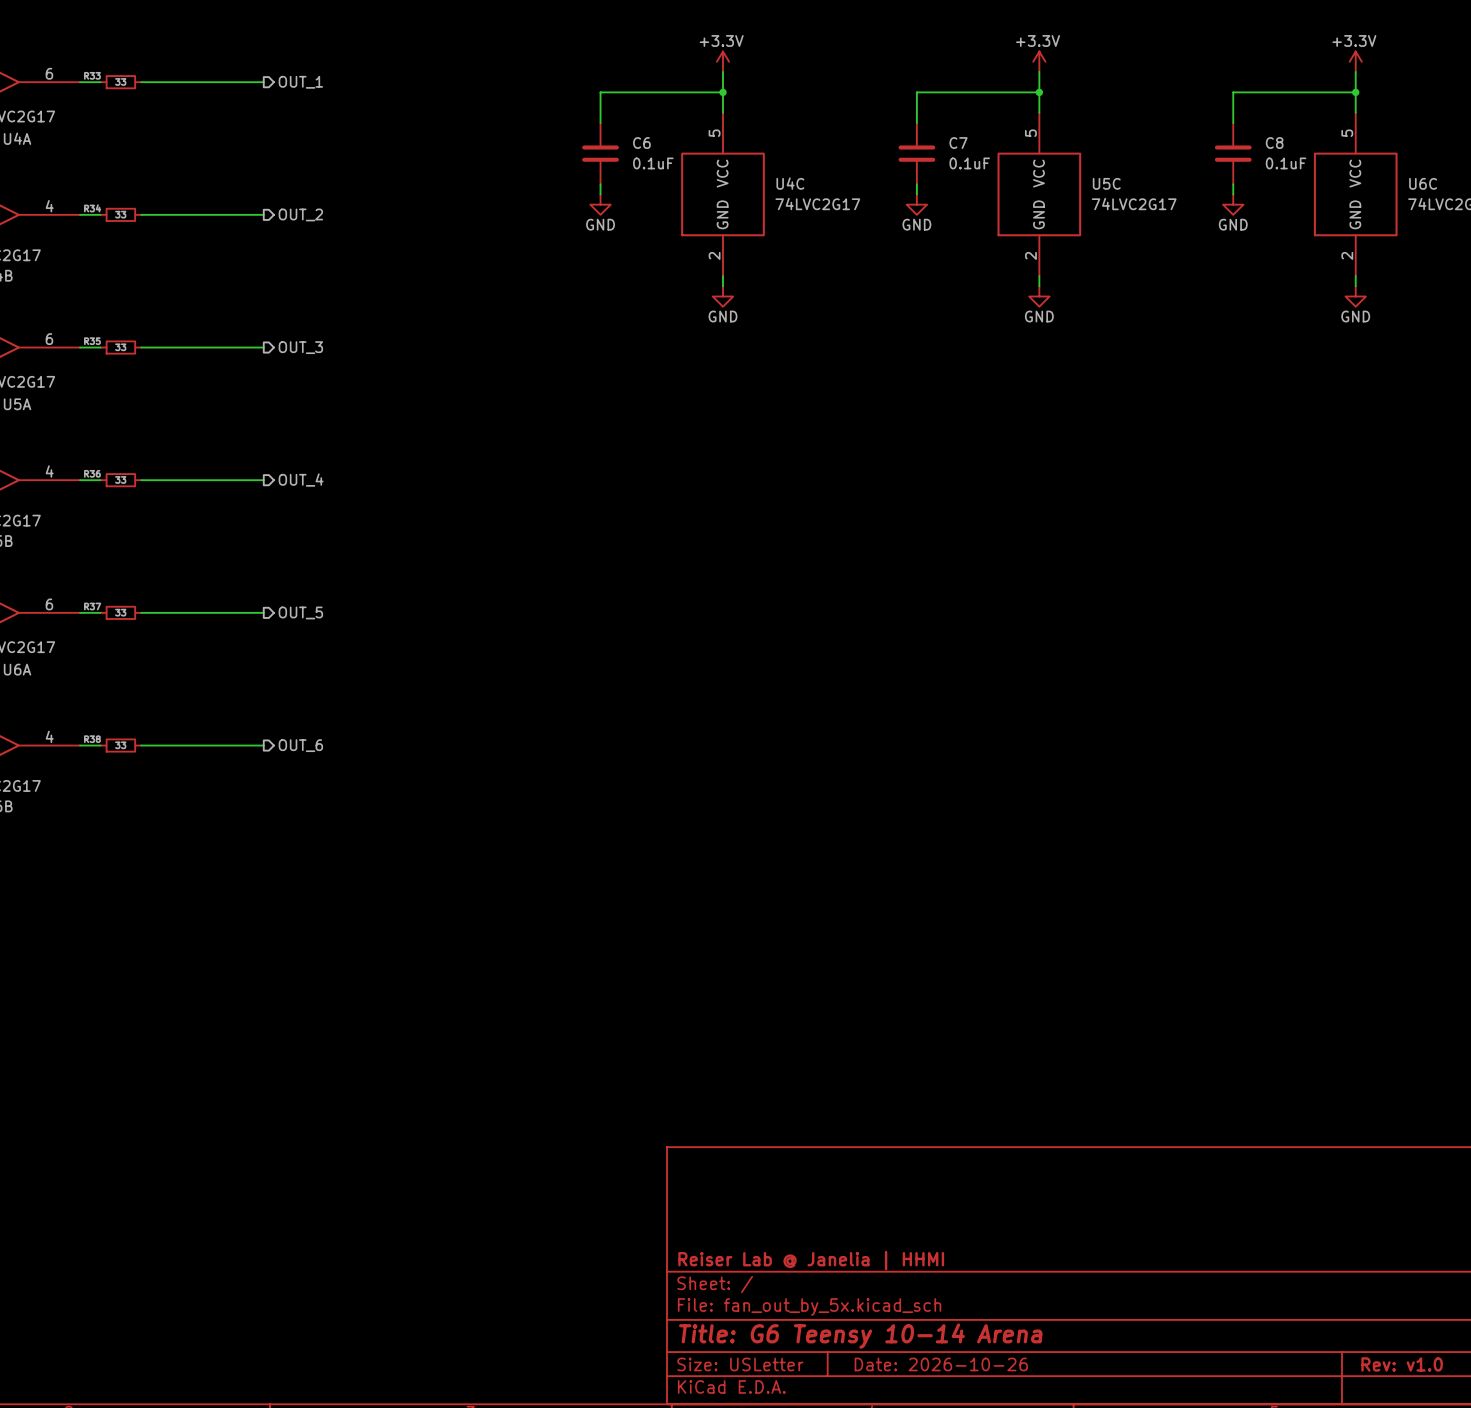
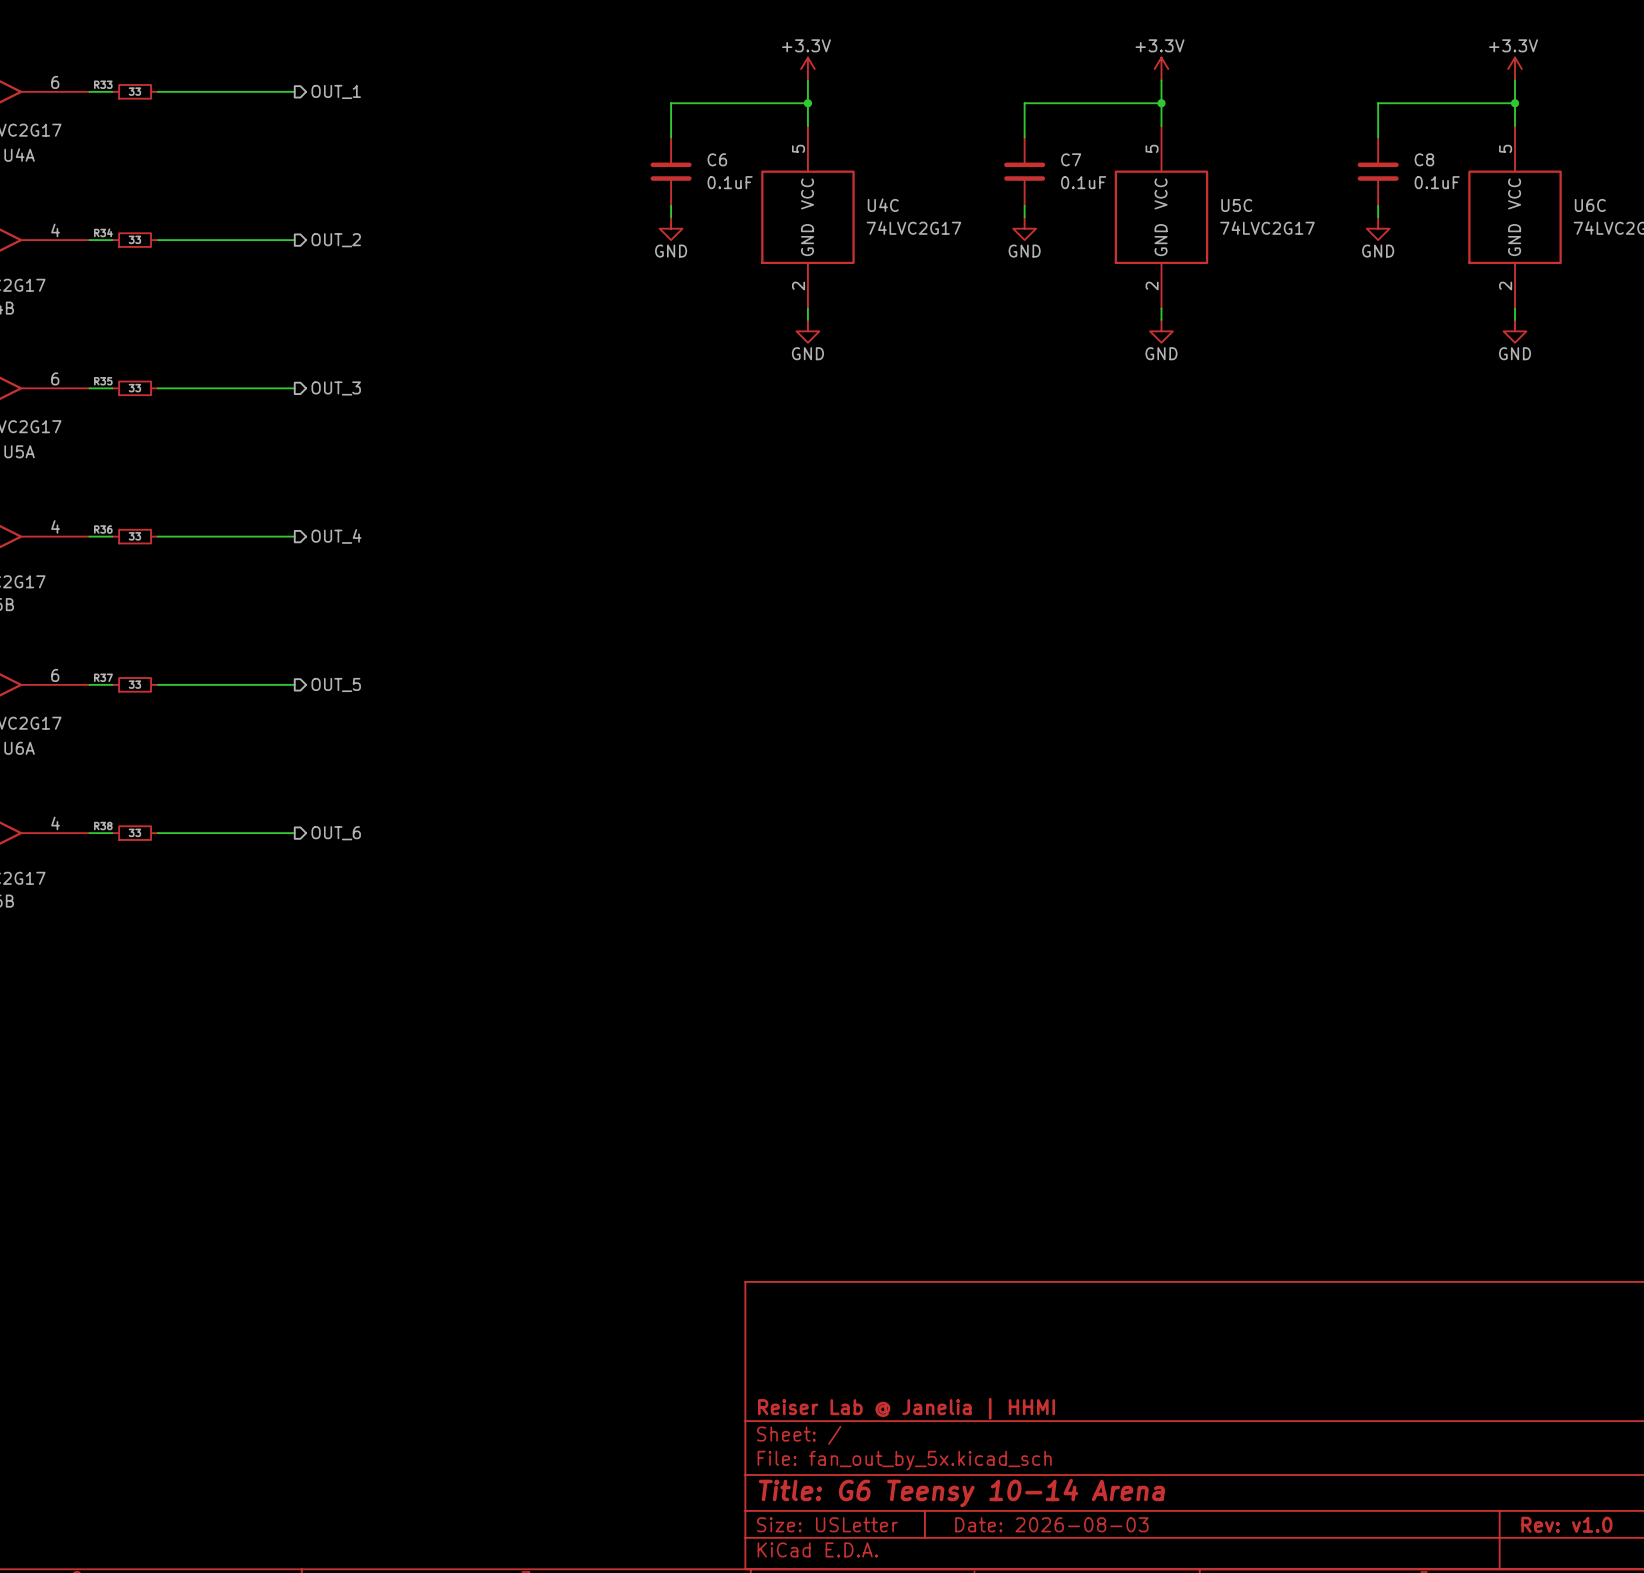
title block: Date: 2026-10-26 (941, 1364) -> Date: 2026-08-03 (1051, 1524)

